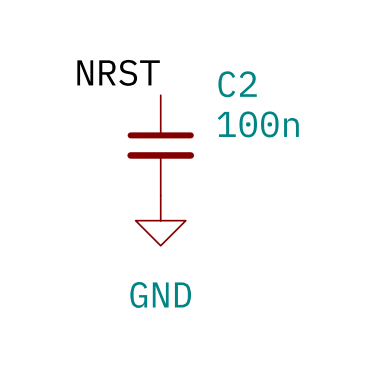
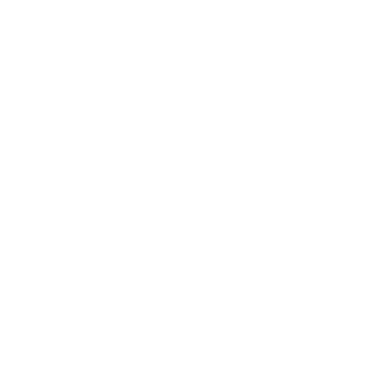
label: NRST (118, 72) -> none
C2: 100n (160, 145) -> none
power symbol: GND (160, 220) -> none

